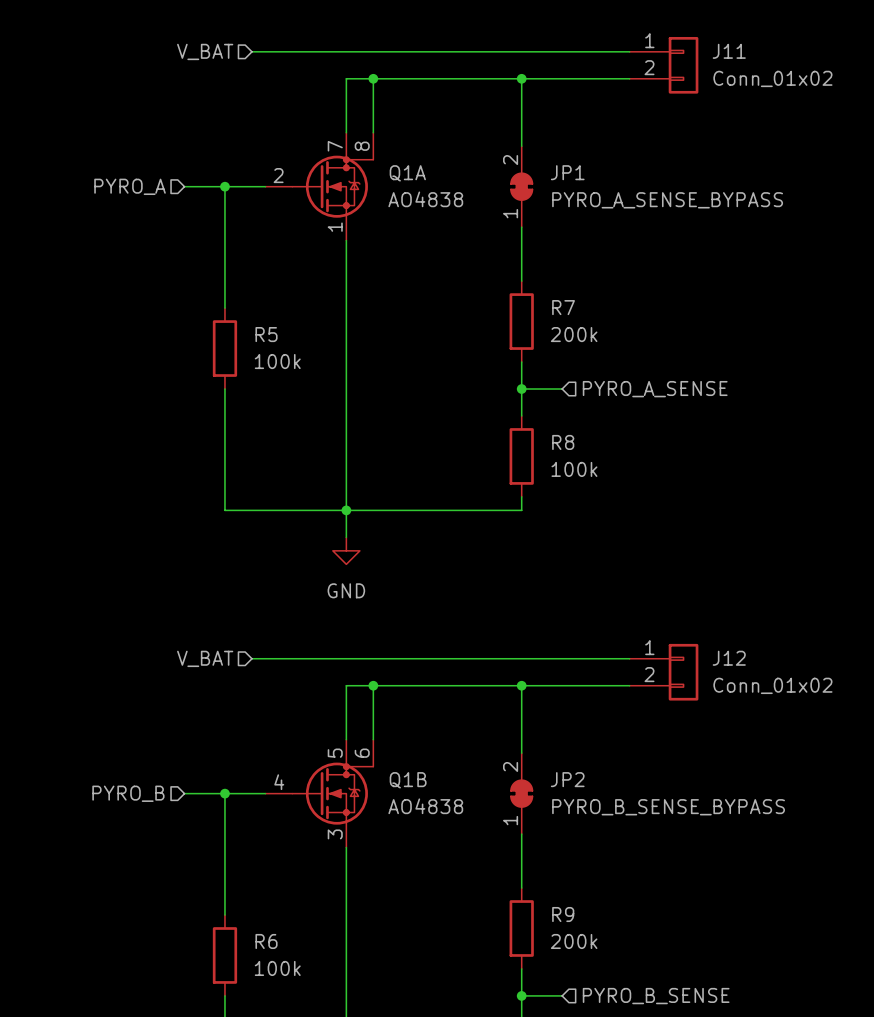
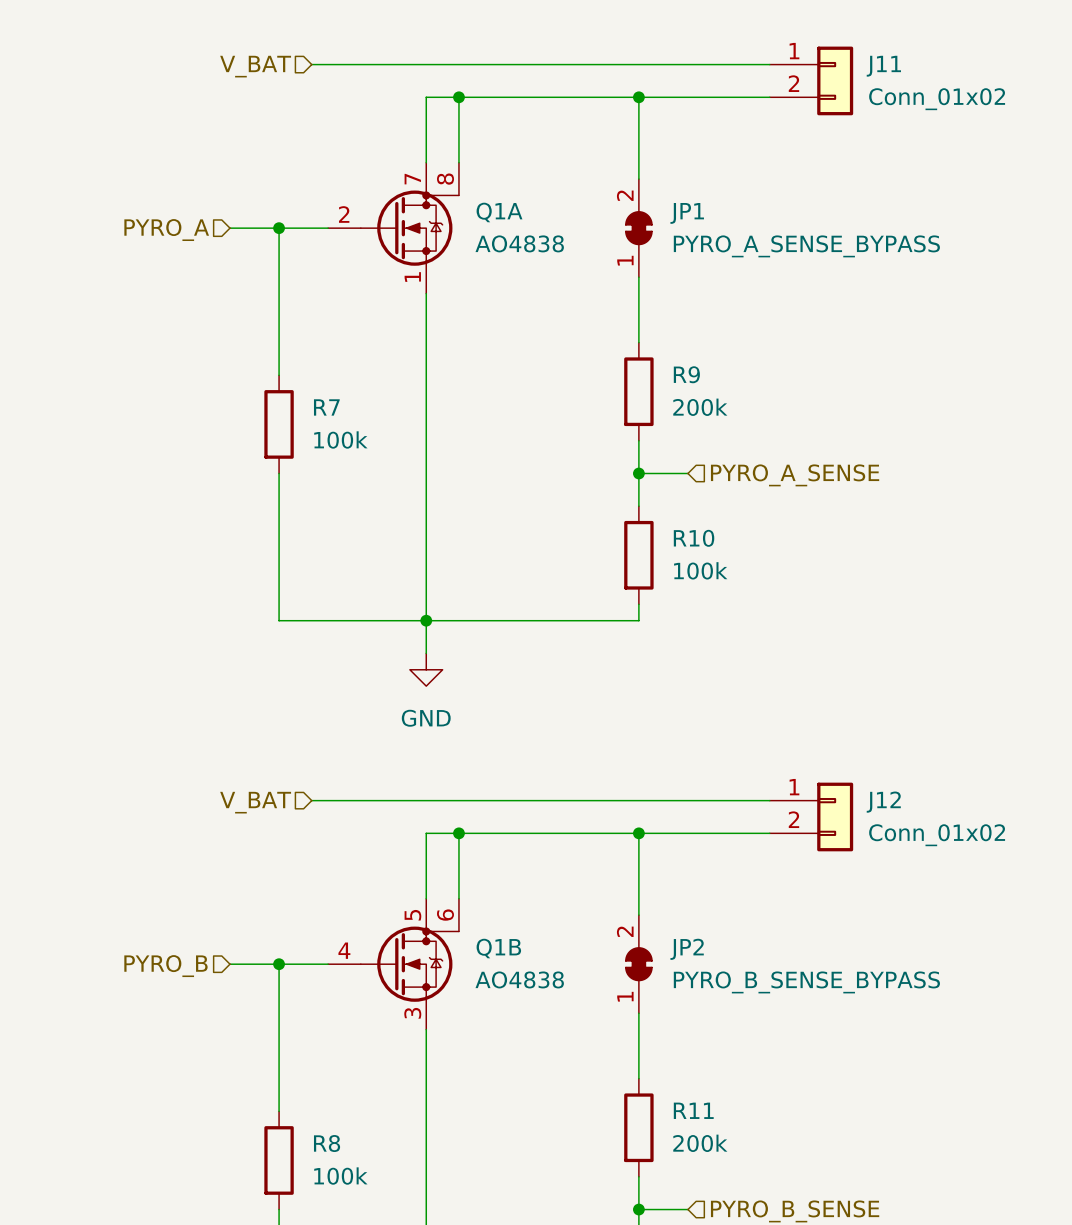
R7 name: R7 (563, 307) -> R9 (686, 374)
R5 name: R5 (266, 334) -> R7 (326, 407)
R8 name: R8 (563, 442) -> R10 (694, 538)
R9 name: R9 (563, 914) -> R11 (693, 1110)
R6 name: R6 (266, 941) -> R8 (327, 1143)

